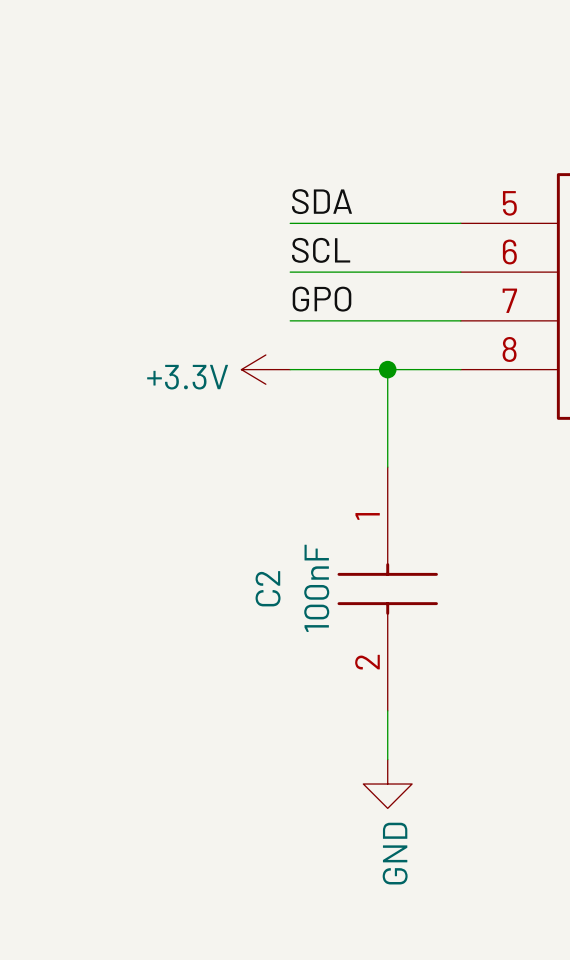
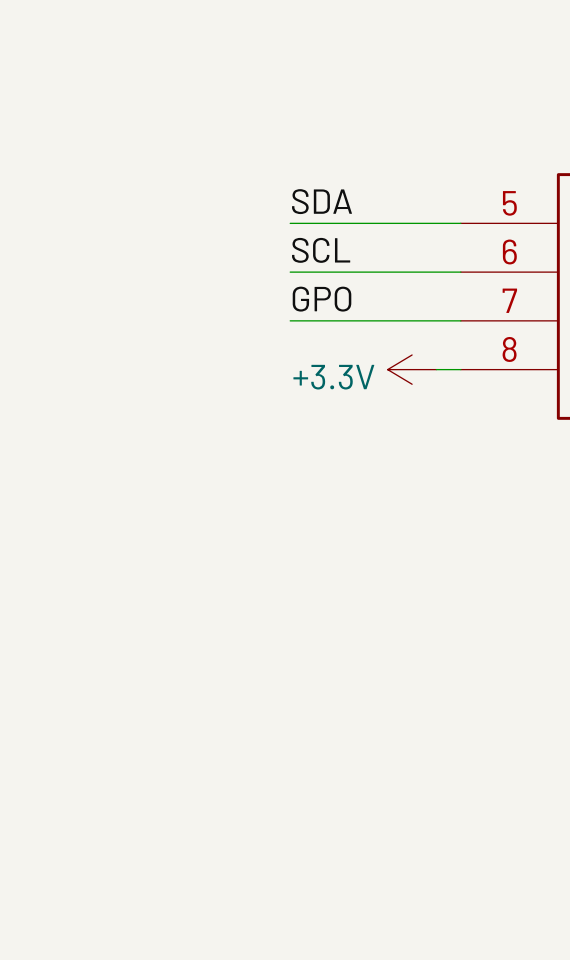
power symbol position: +3.3V (265, 369) -> +3.3V (412, 369)
wire: (290, 369) (436, 369) -> none
wire: (387, 369) (387, 467) -> none
junction: (387, 369) -> none
C2: 100nF (387, 589) -> none
wire: (387, 710) (387, 759) -> none
power symbol: GND (387, 784) -> none

